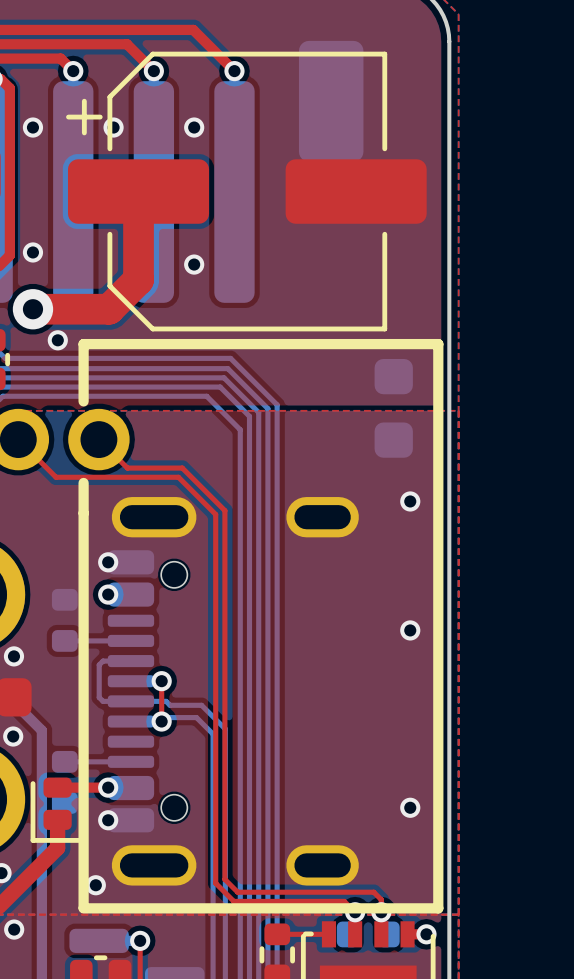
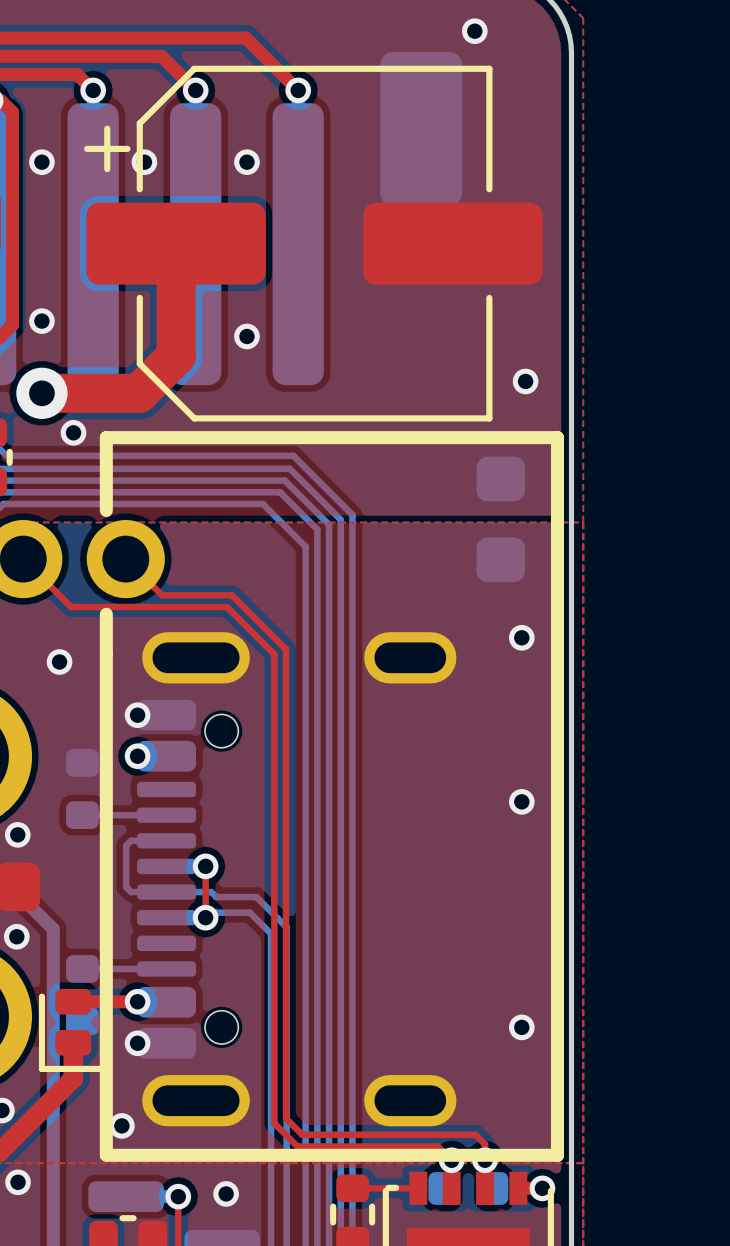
via: none -> (474, 31)
via: none -> (525, 381)
via: none -> (59, 662)
via: none -> (226, 1193)

